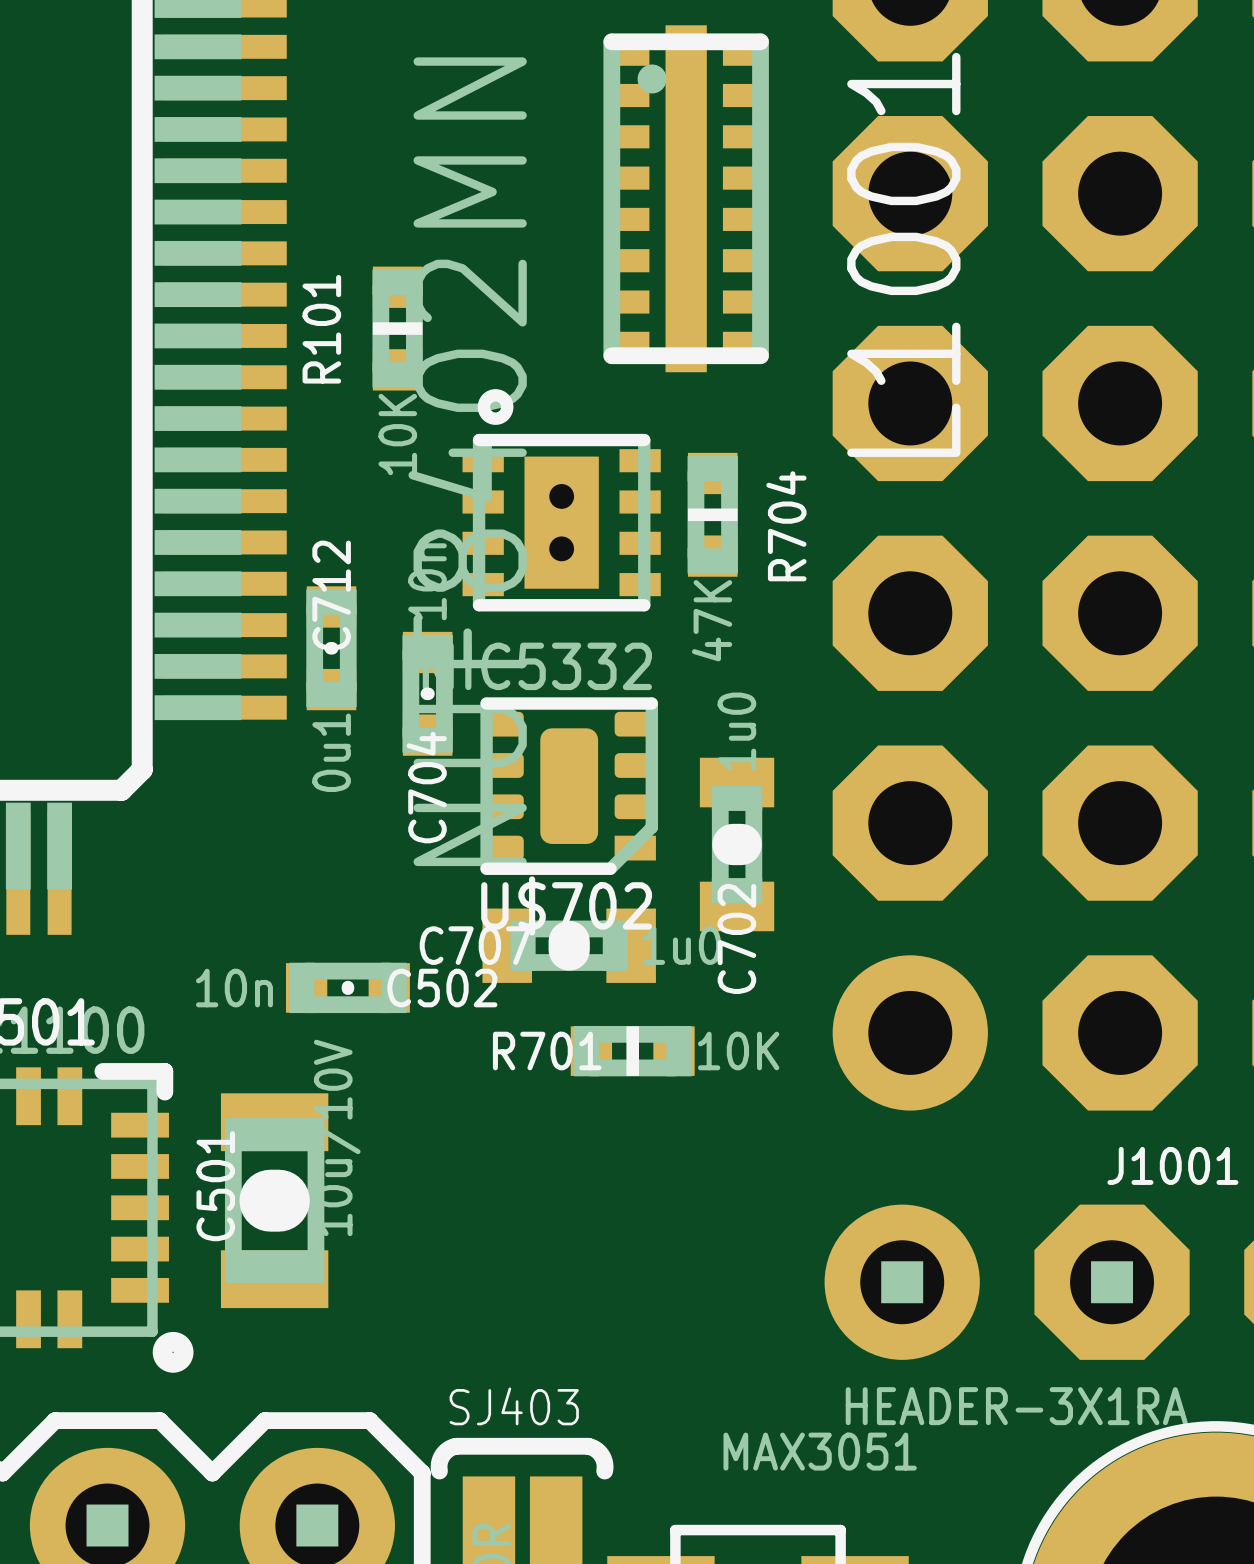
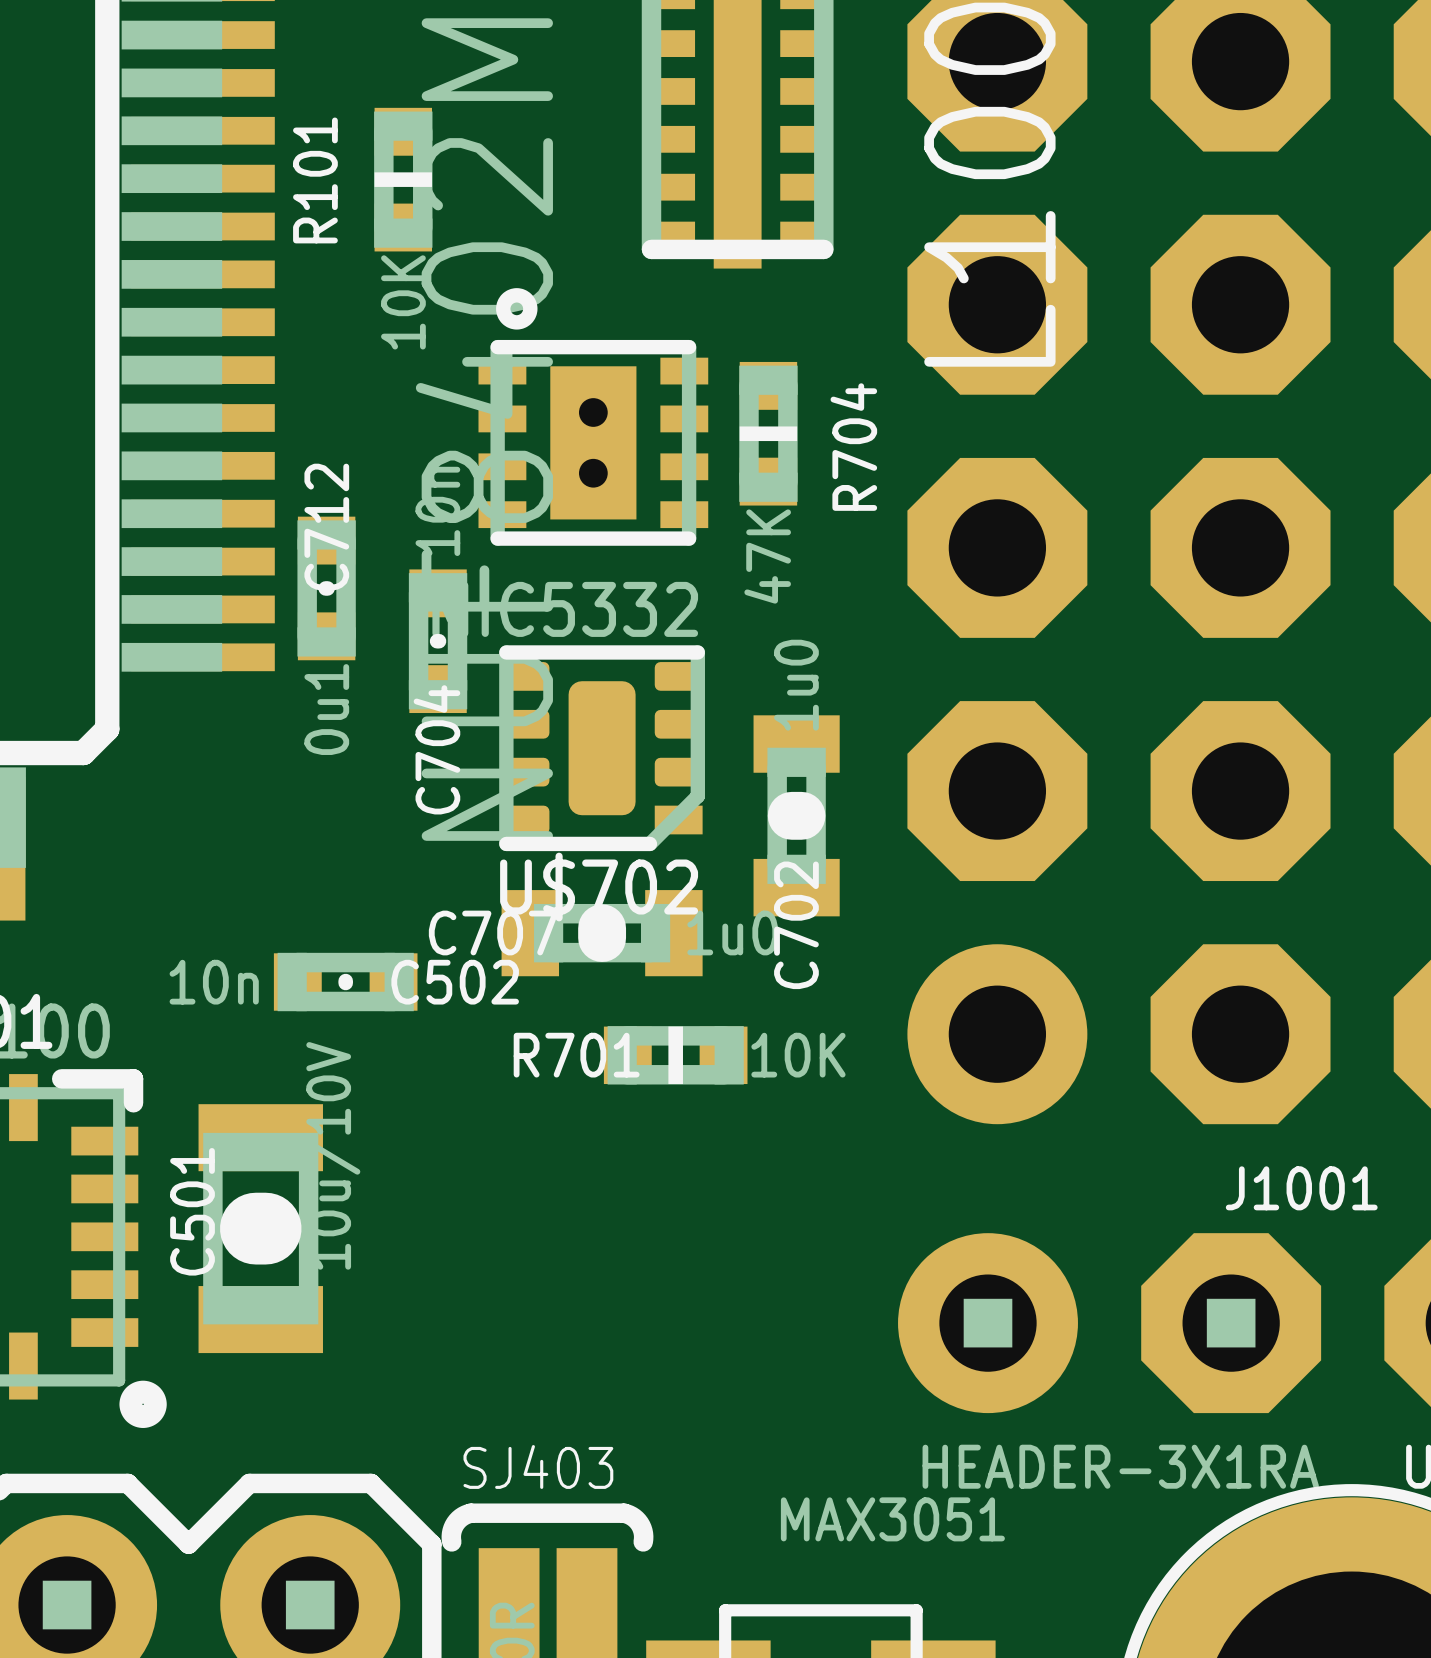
R101 position: (397, 328) -> (403, 179)

